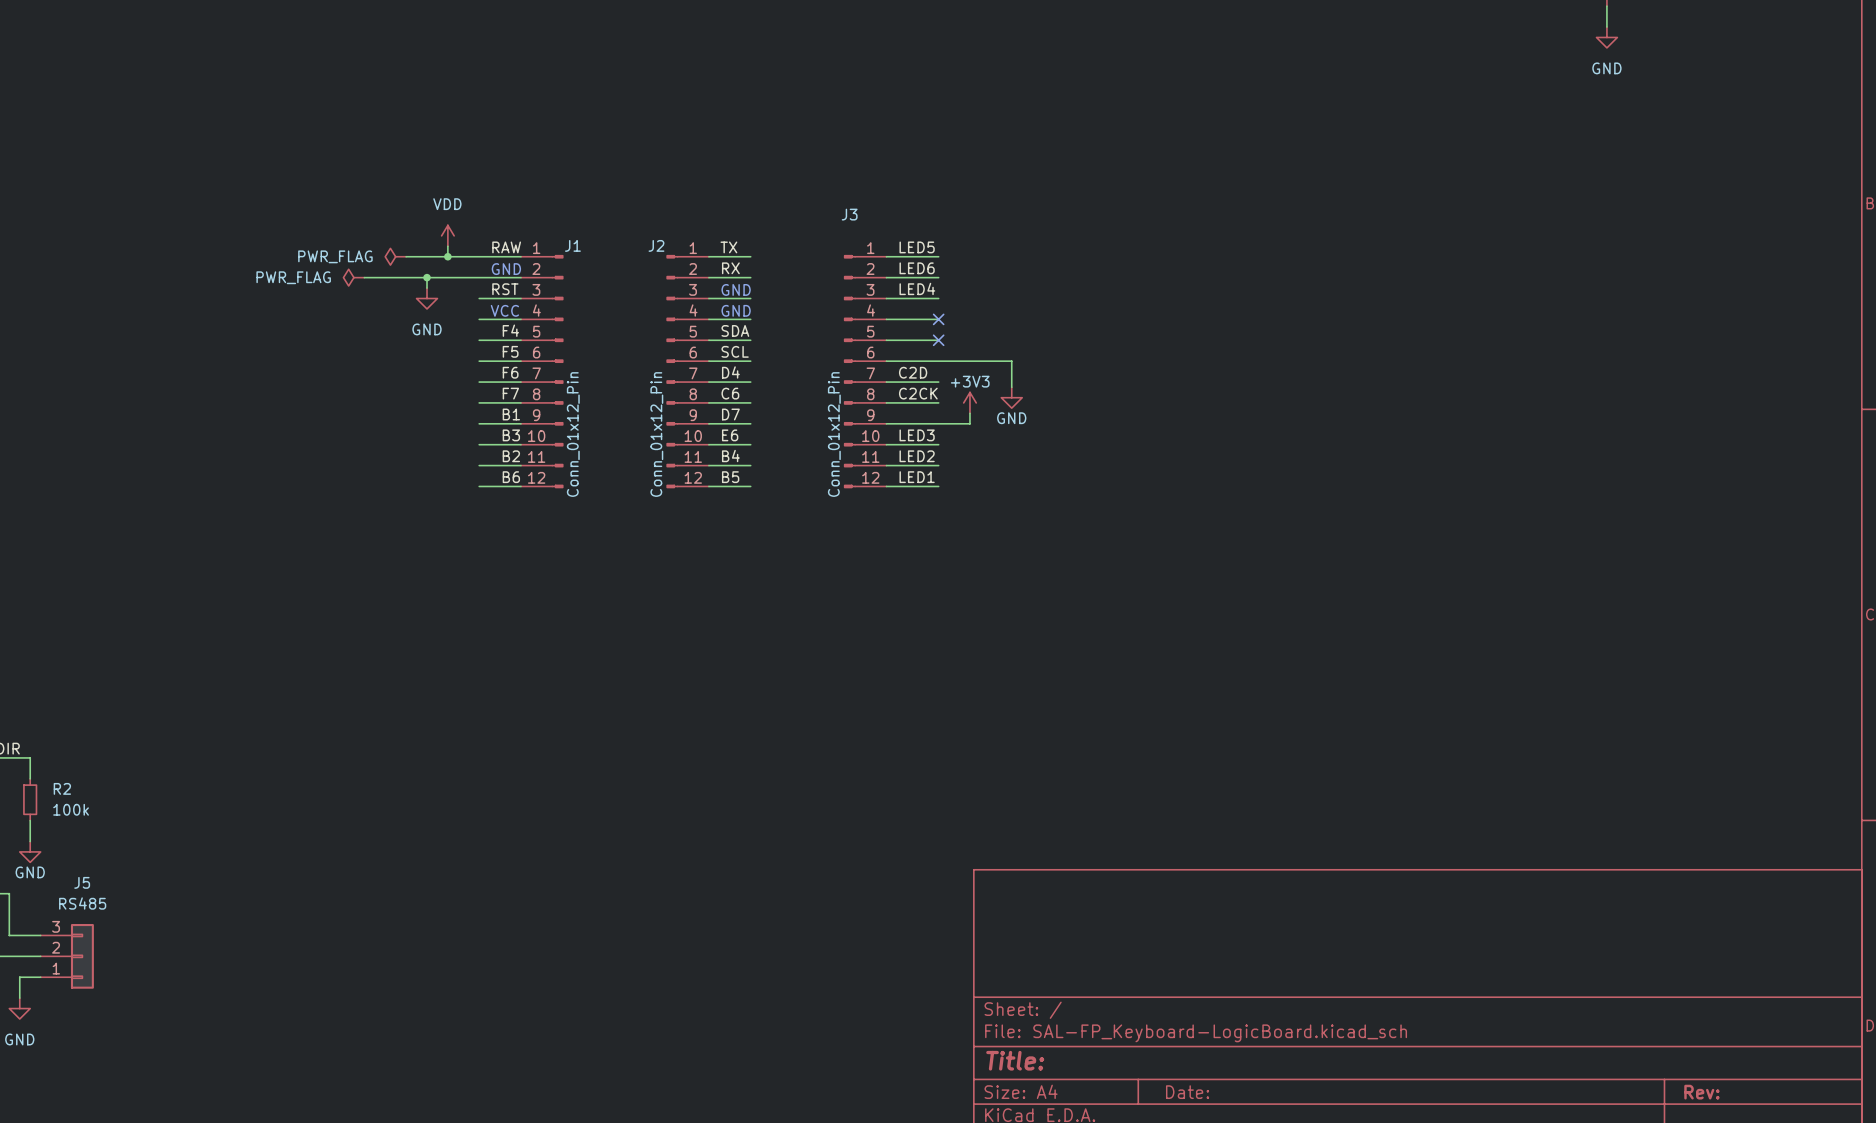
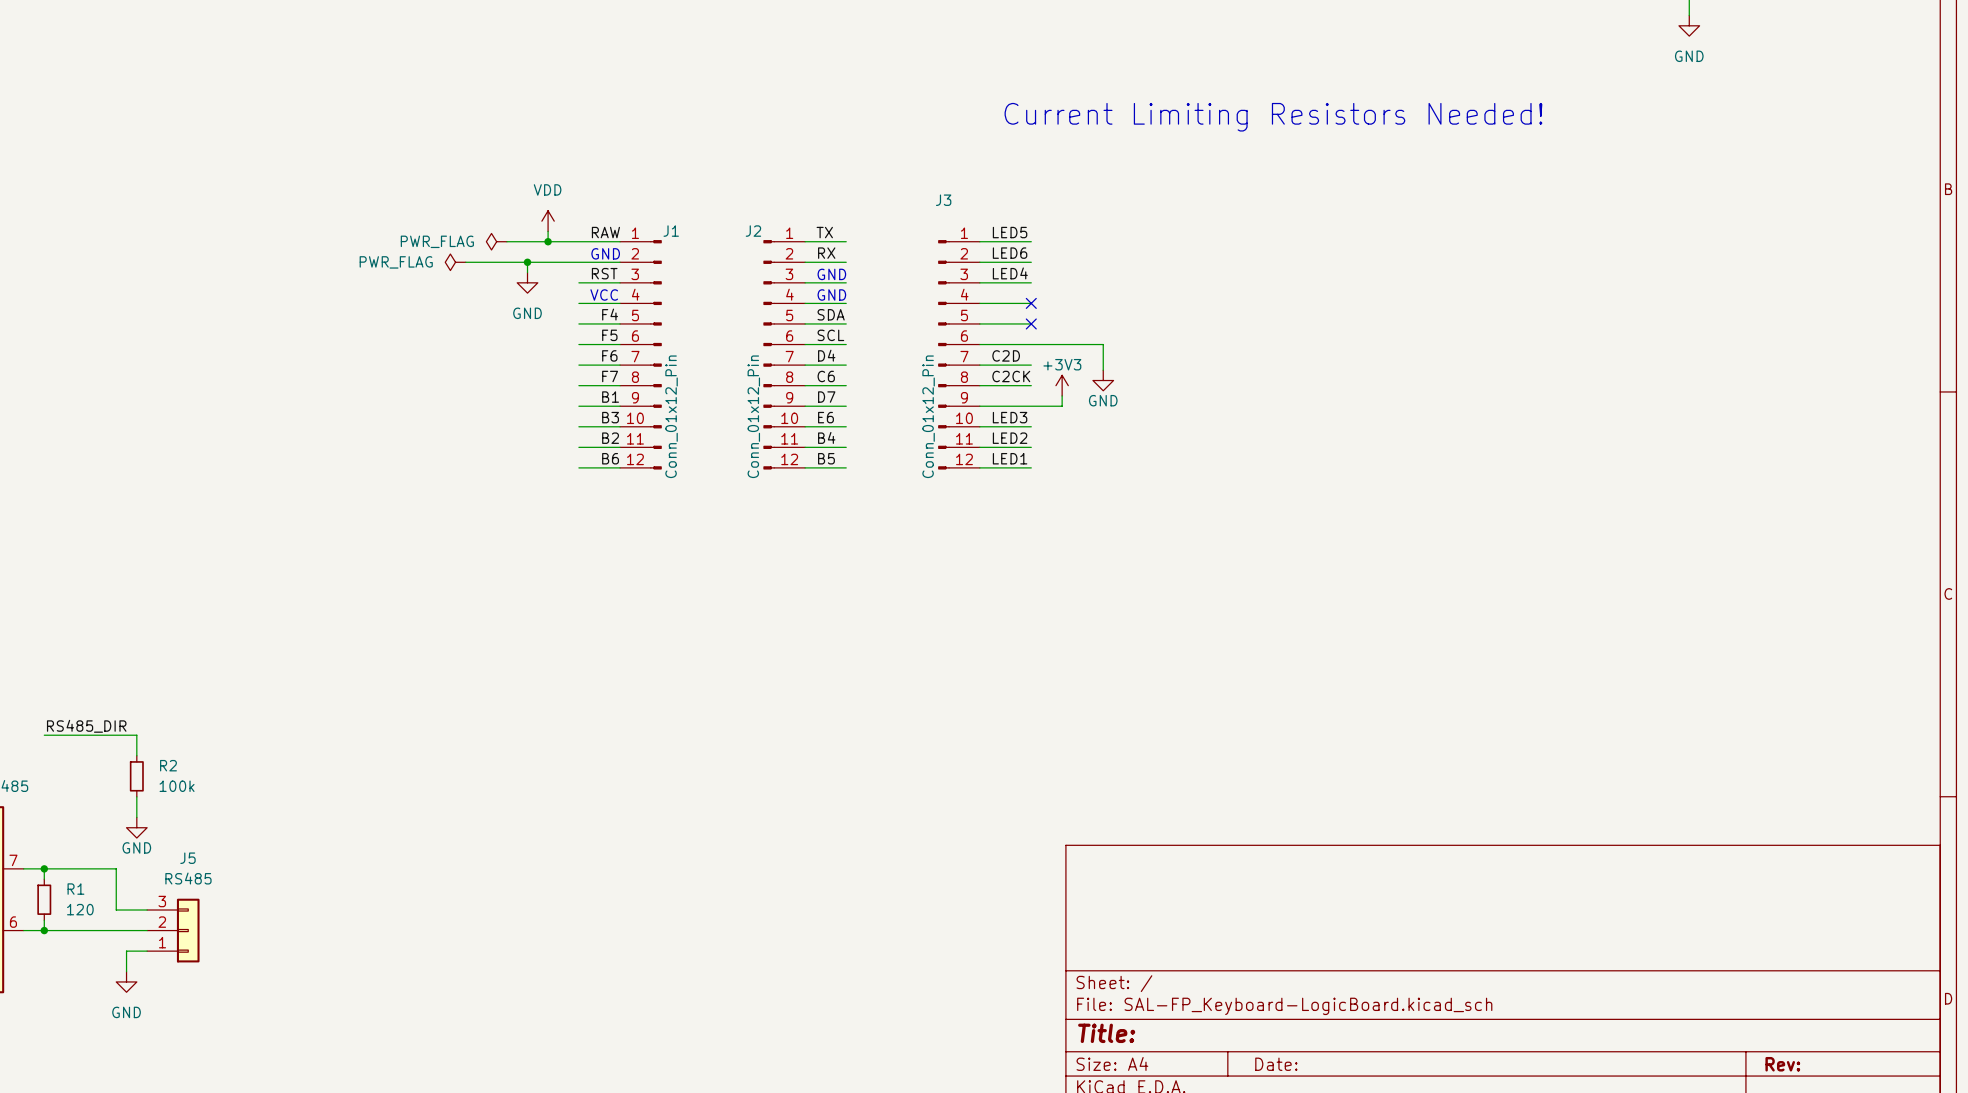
text: none -> Current Limiting Resistors Needed! (1273, 117)

